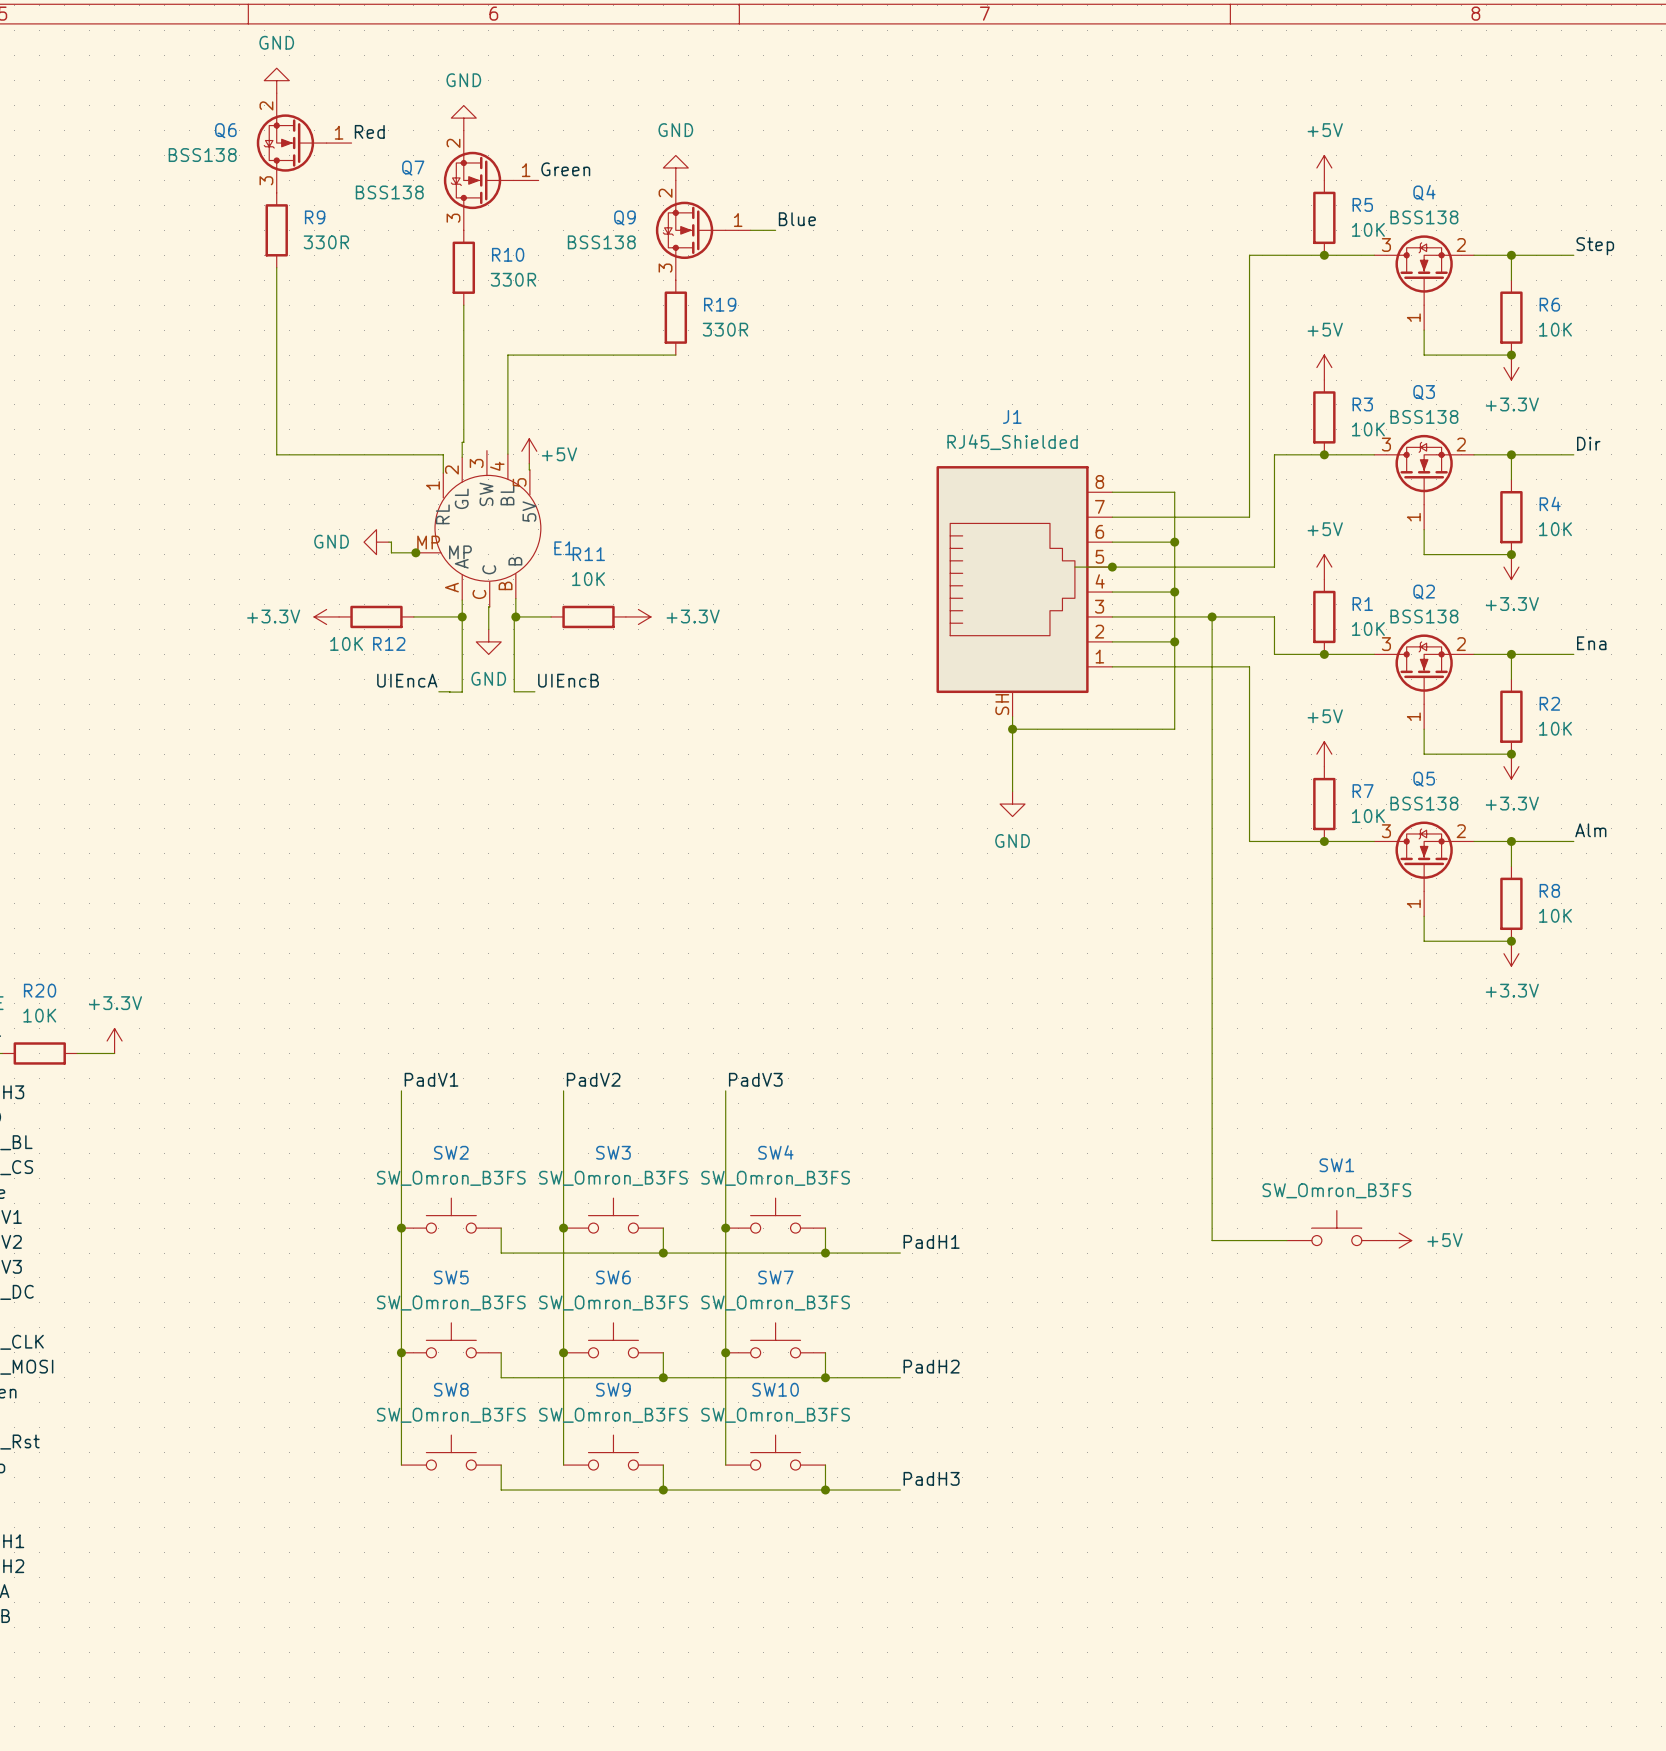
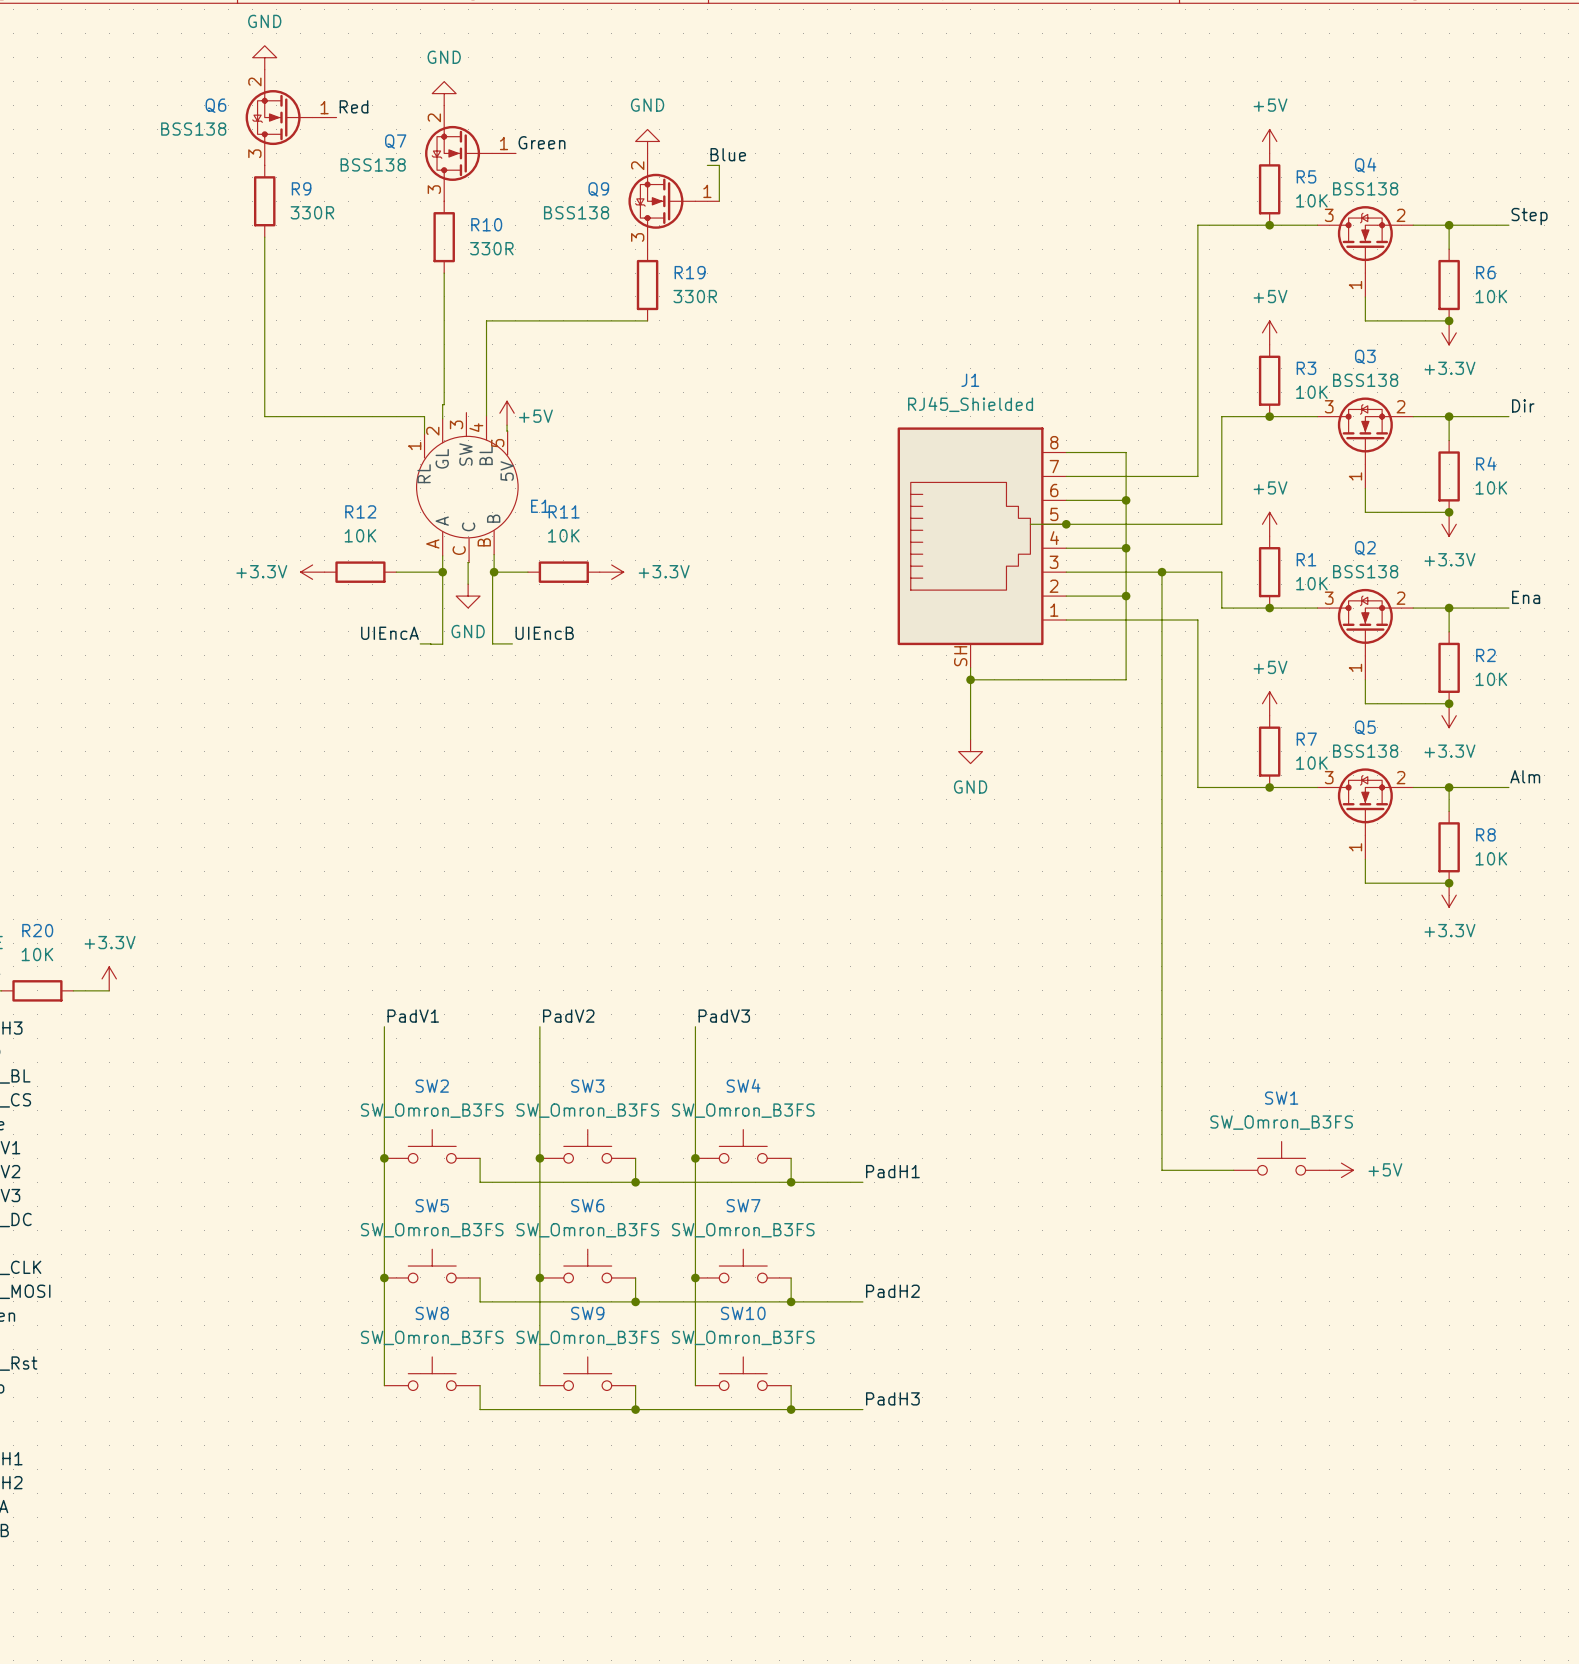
label position: Blue (797, 219) -> Blue (728, 154)
wire: (750, 230) (775, 230) -> (719, 201) (719, 165) (707, 165)
E1 symbol: [415, 450, 541, 607] -> [416, 412, 519, 563]
power symbol: GND (376, 542) -> none
wire: (388, 542) (391, 542) (391, 552) (416, 552) -> none
junction: (415, 552) -> none
R12 value position: 10K (346, 643) -> 10K (360, 535)
R12 name position: R12 (389, 643) -> R12 (360, 511)

